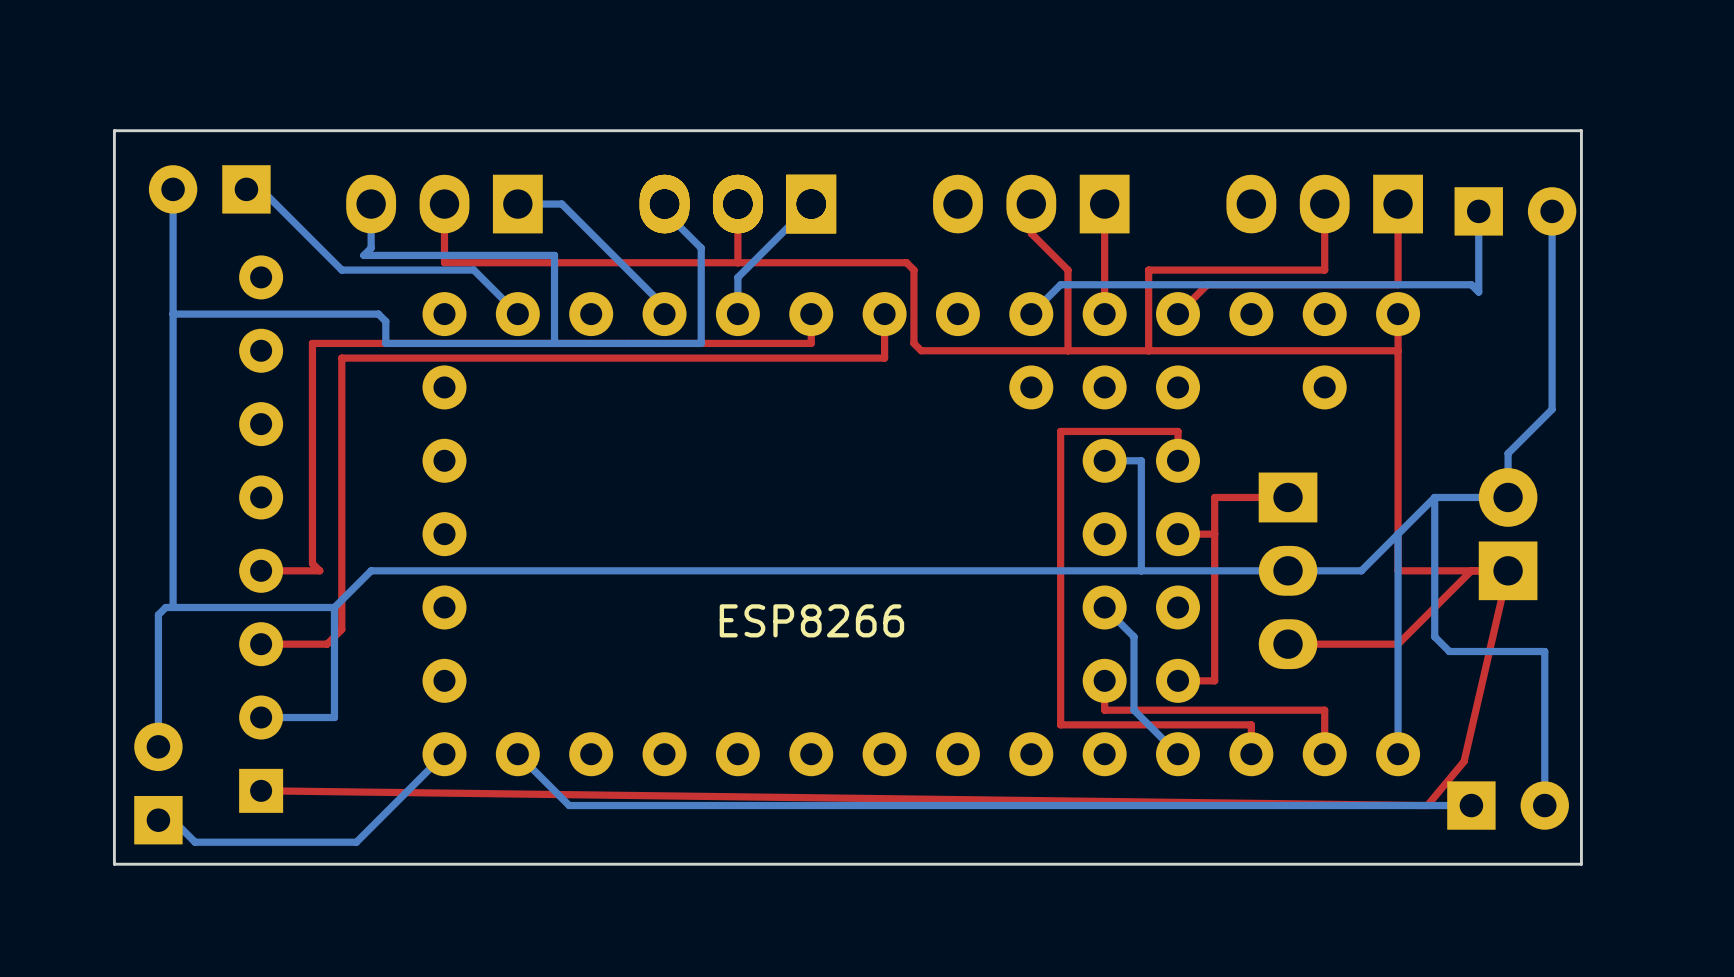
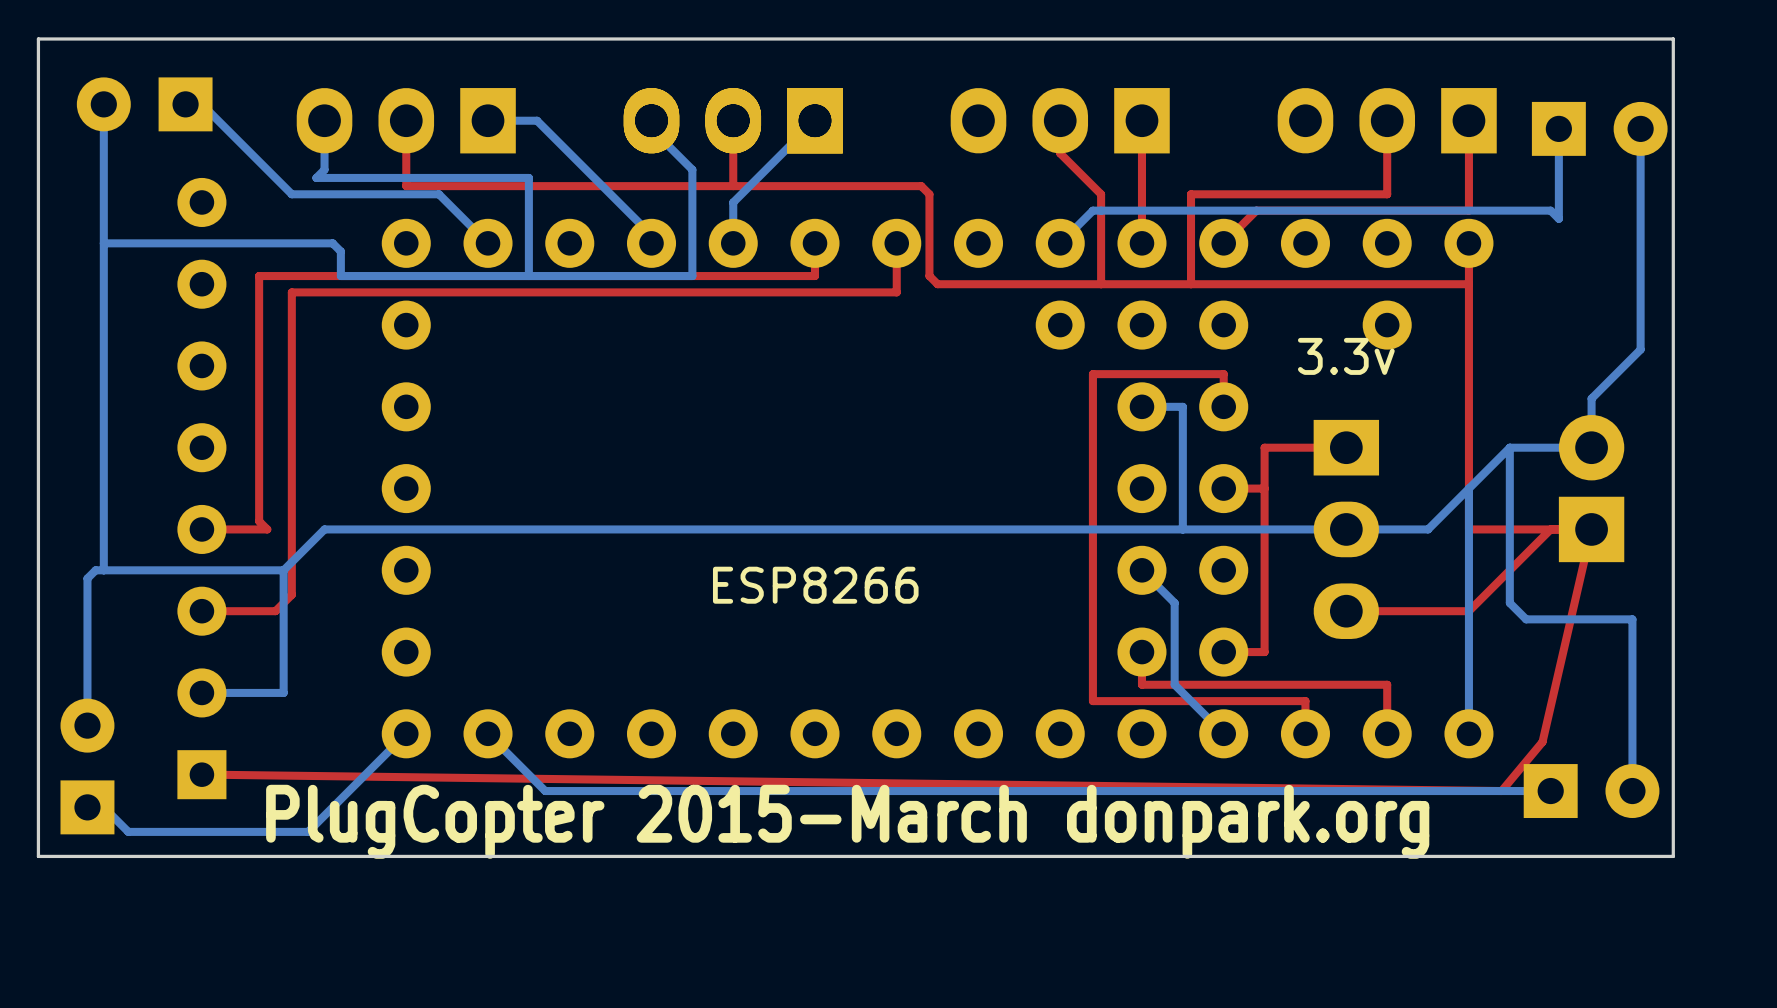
part value: none -> 3.3v (1346, 356)
text: none -> PlugCopter 2015-March donpark.org (847, 821)

